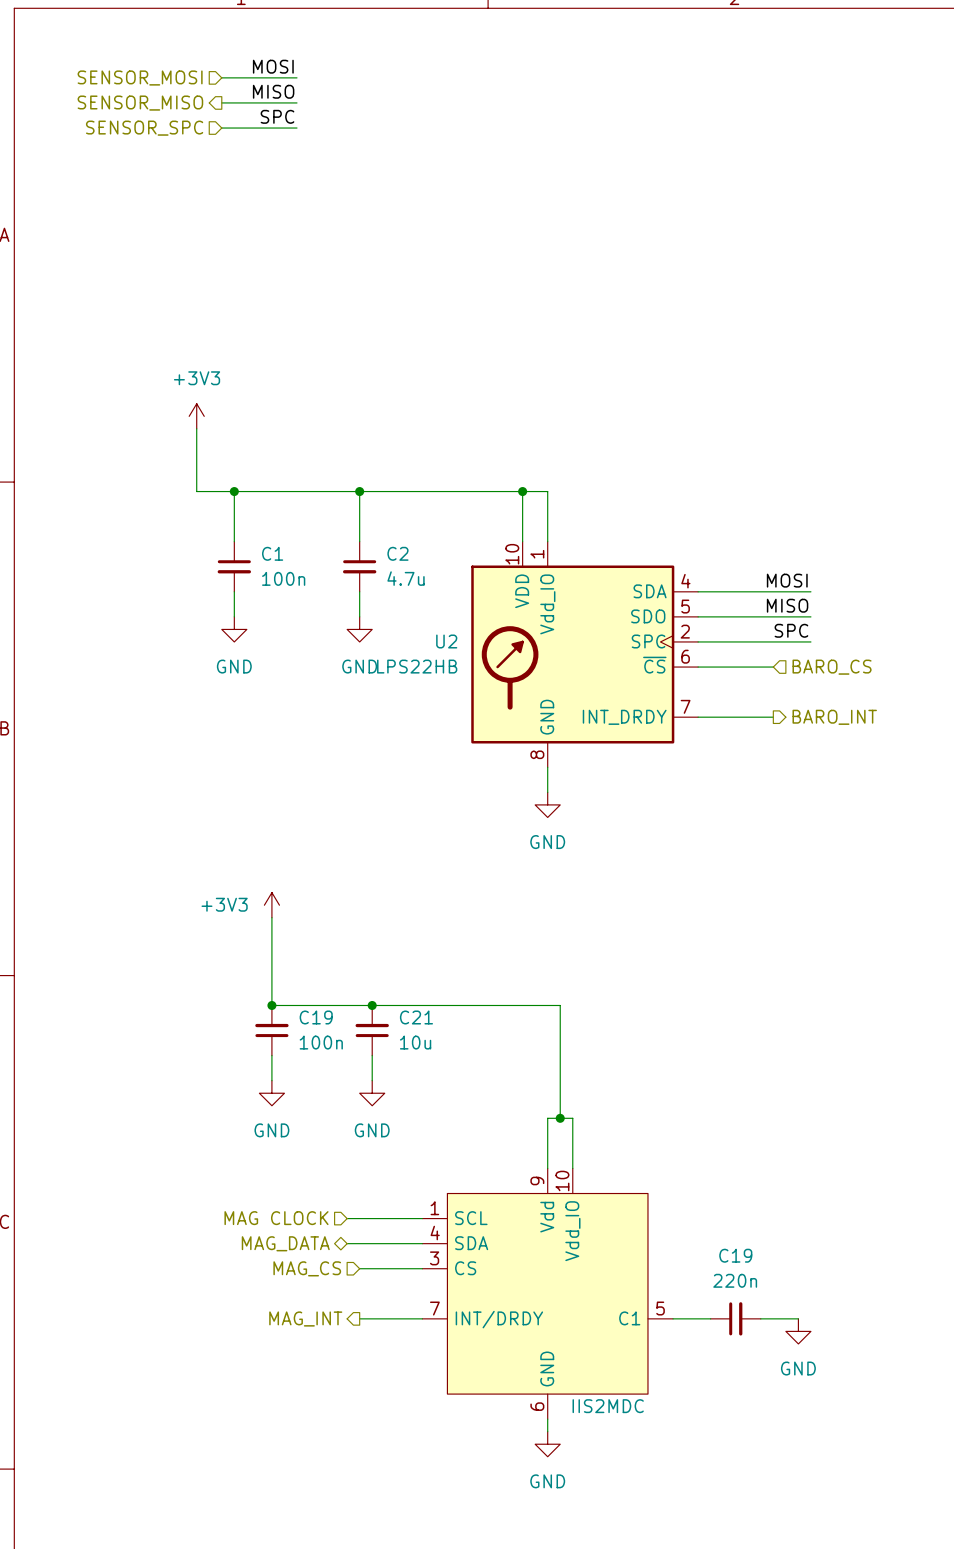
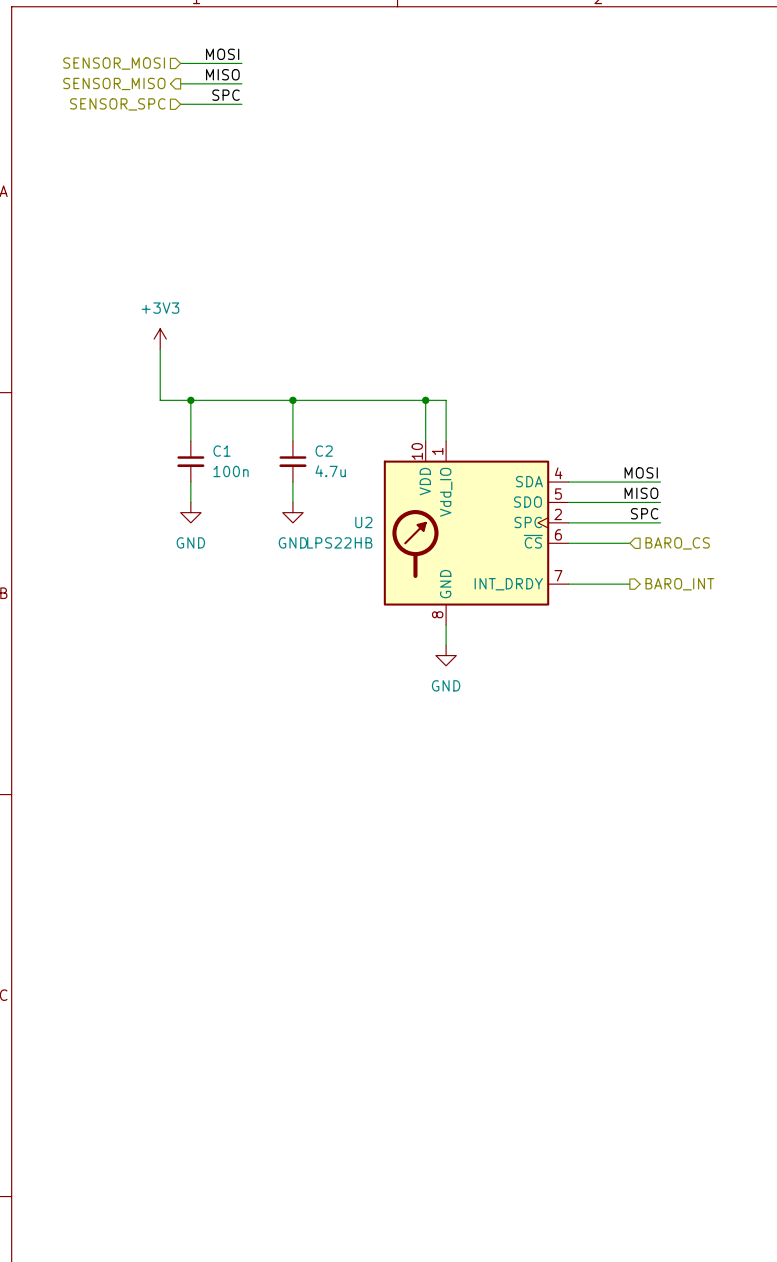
power symbol: +3V3 (271, 905) -> none
wire: (271, 917) (271, 1005) (560, 1005) (560, 1118) -> none
junction: (271, 1005) -> none
junction: (372, 1005) -> none
C19: 100n (271, 1030) -> none
C21: 10u (372, 1030) -> none
wire: (271, 1055) (271, 1080) -> none
wire: (372, 1055) (372, 1080) -> none
power symbol: GND (271, 1093) -> none
power symbol: GND (372, 1093) -> none
junction: (560, 1118) -> none
wire: (547, 1168) (547, 1118) (572, 1118) (572, 1168) -> none
hierarchical label: MAG CLOCK (276, 1218) -> none
wire: (347, 1218) (422, 1218) -> none
hierarchical label: MAG_DATA (285, 1243) -> none
wire: (347, 1243) (422, 1243) -> none
hierarchical label: MAG_CS (307, 1268) -> none
wire: (359, 1268) (422, 1268) -> none
part: IIS2MDC (547, 1293) -> none
hierarchical label: MAG_INT (305, 1318) -> none
wire: (359, 1318) (422, 1318) -> none
wire: (673, 1318) (710, 1318) -> none
C19: 220n (735, 1318) -> none
wire: (760, 1318) (798, 1318) -> none
power symbol: GND (798, 1331) -> none
wire: (547, 1419) (547, 1431) -> none
power symbol: GND (547, 1444) -> none

